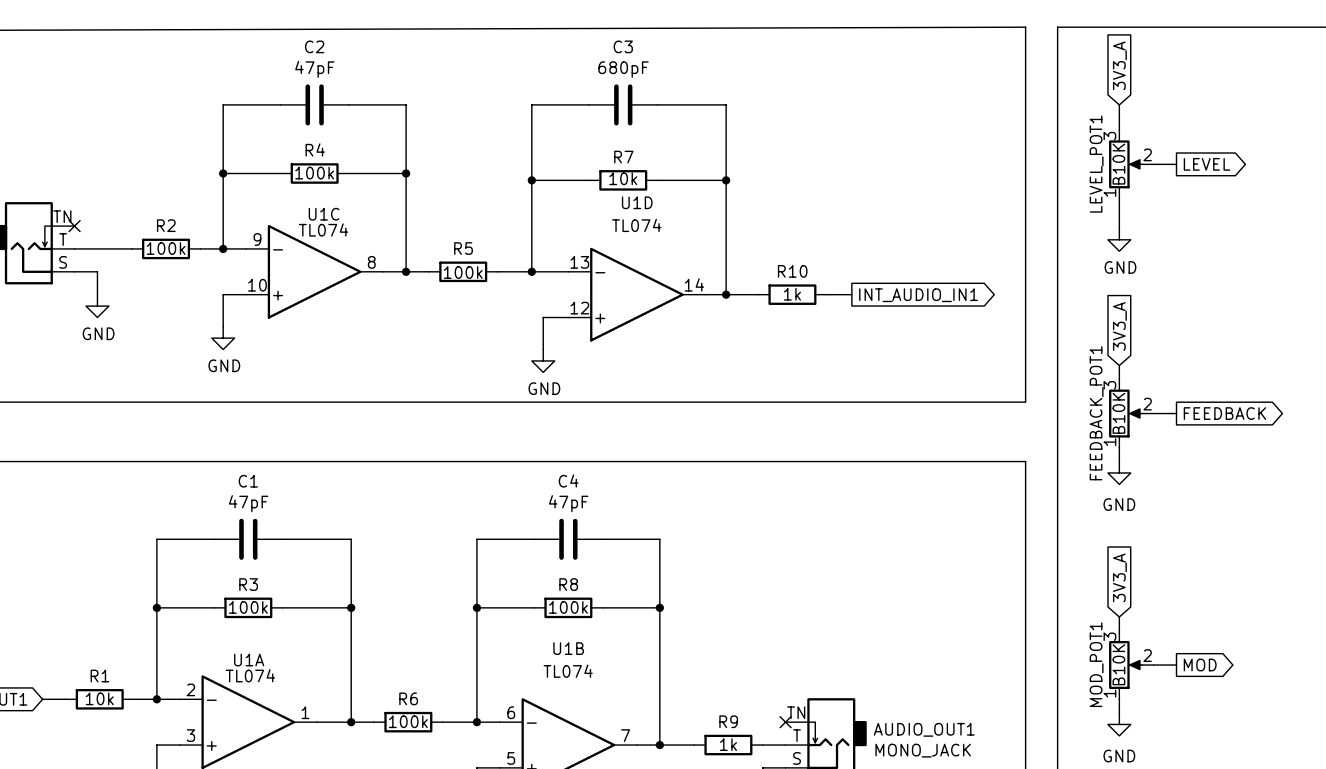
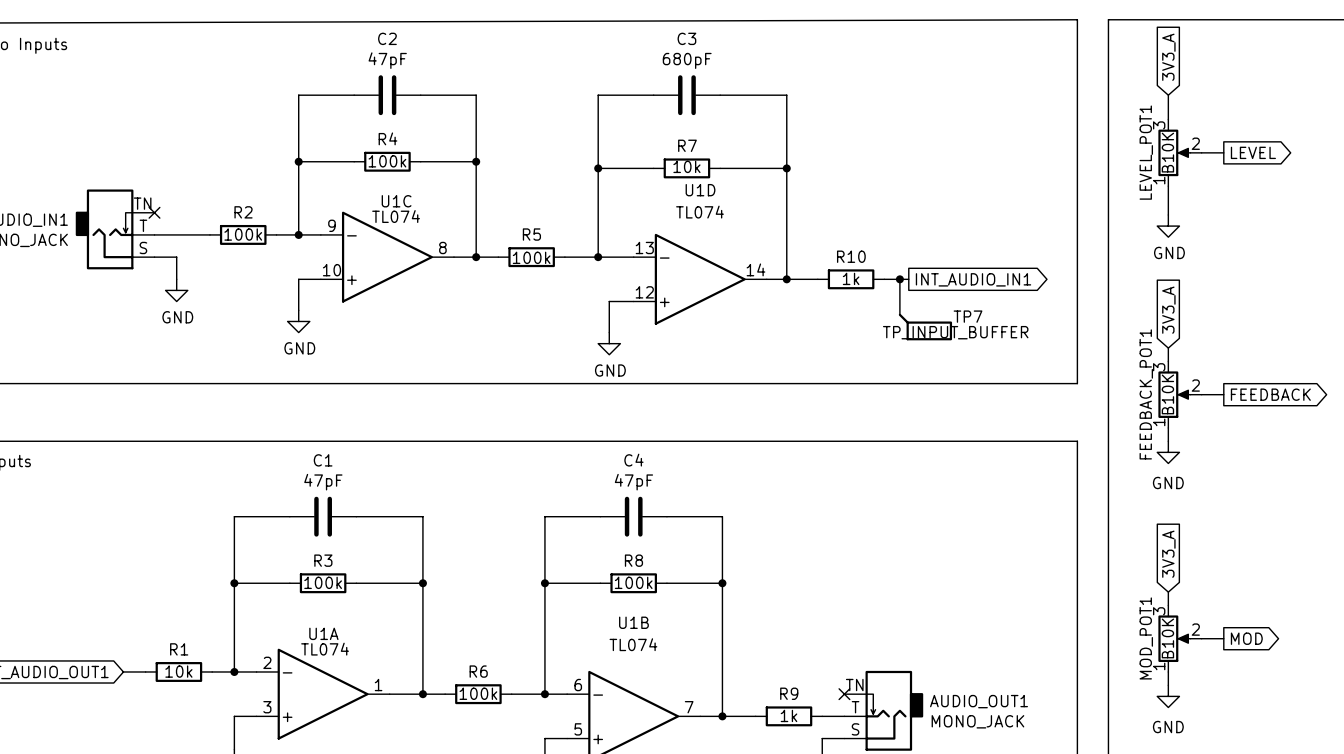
wire: none -> (899, 279) (899, 314)
junction: none -> (899, 279)
TP7: none -> TP_INPUT_BUFFER (925, 327)

